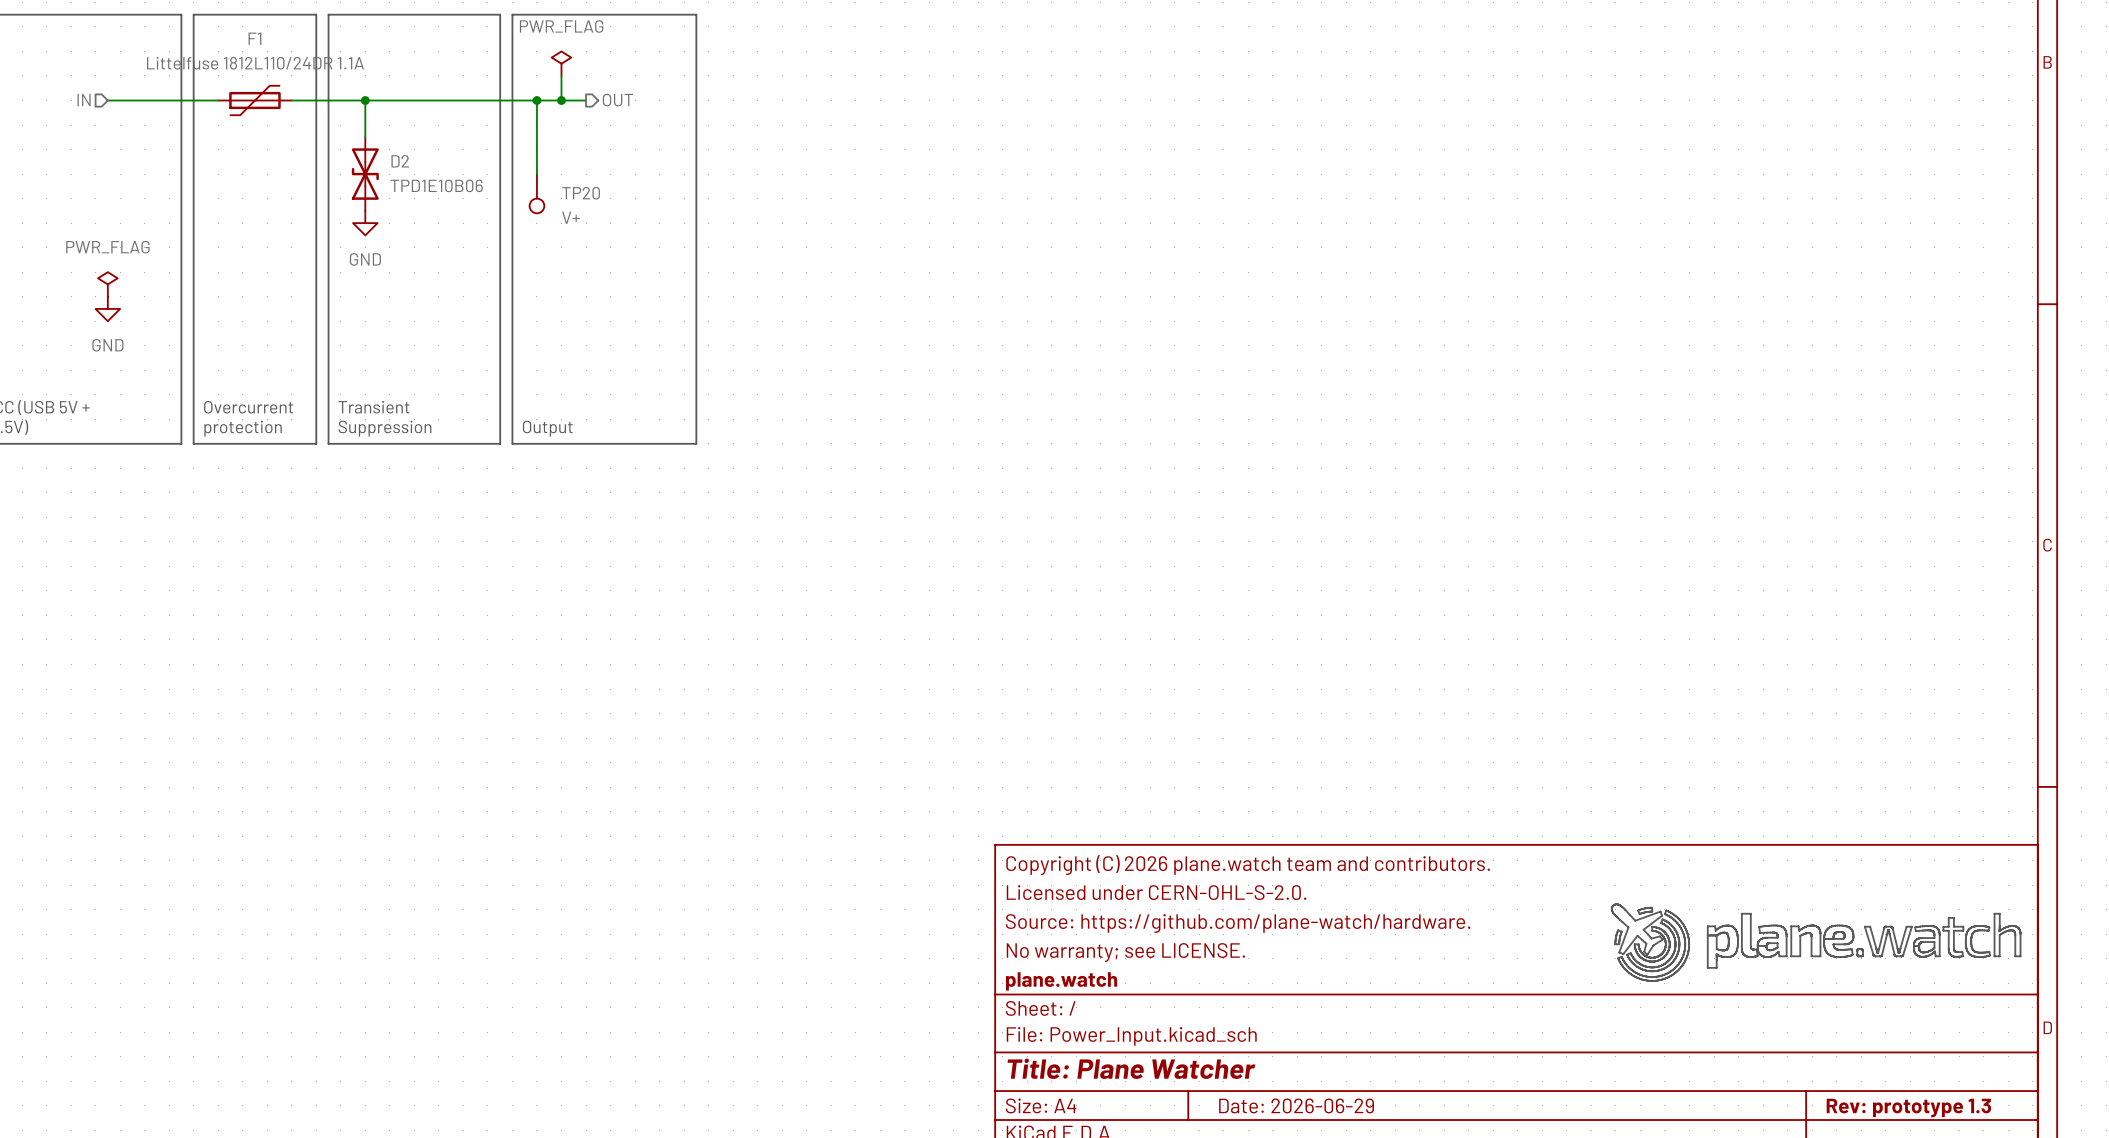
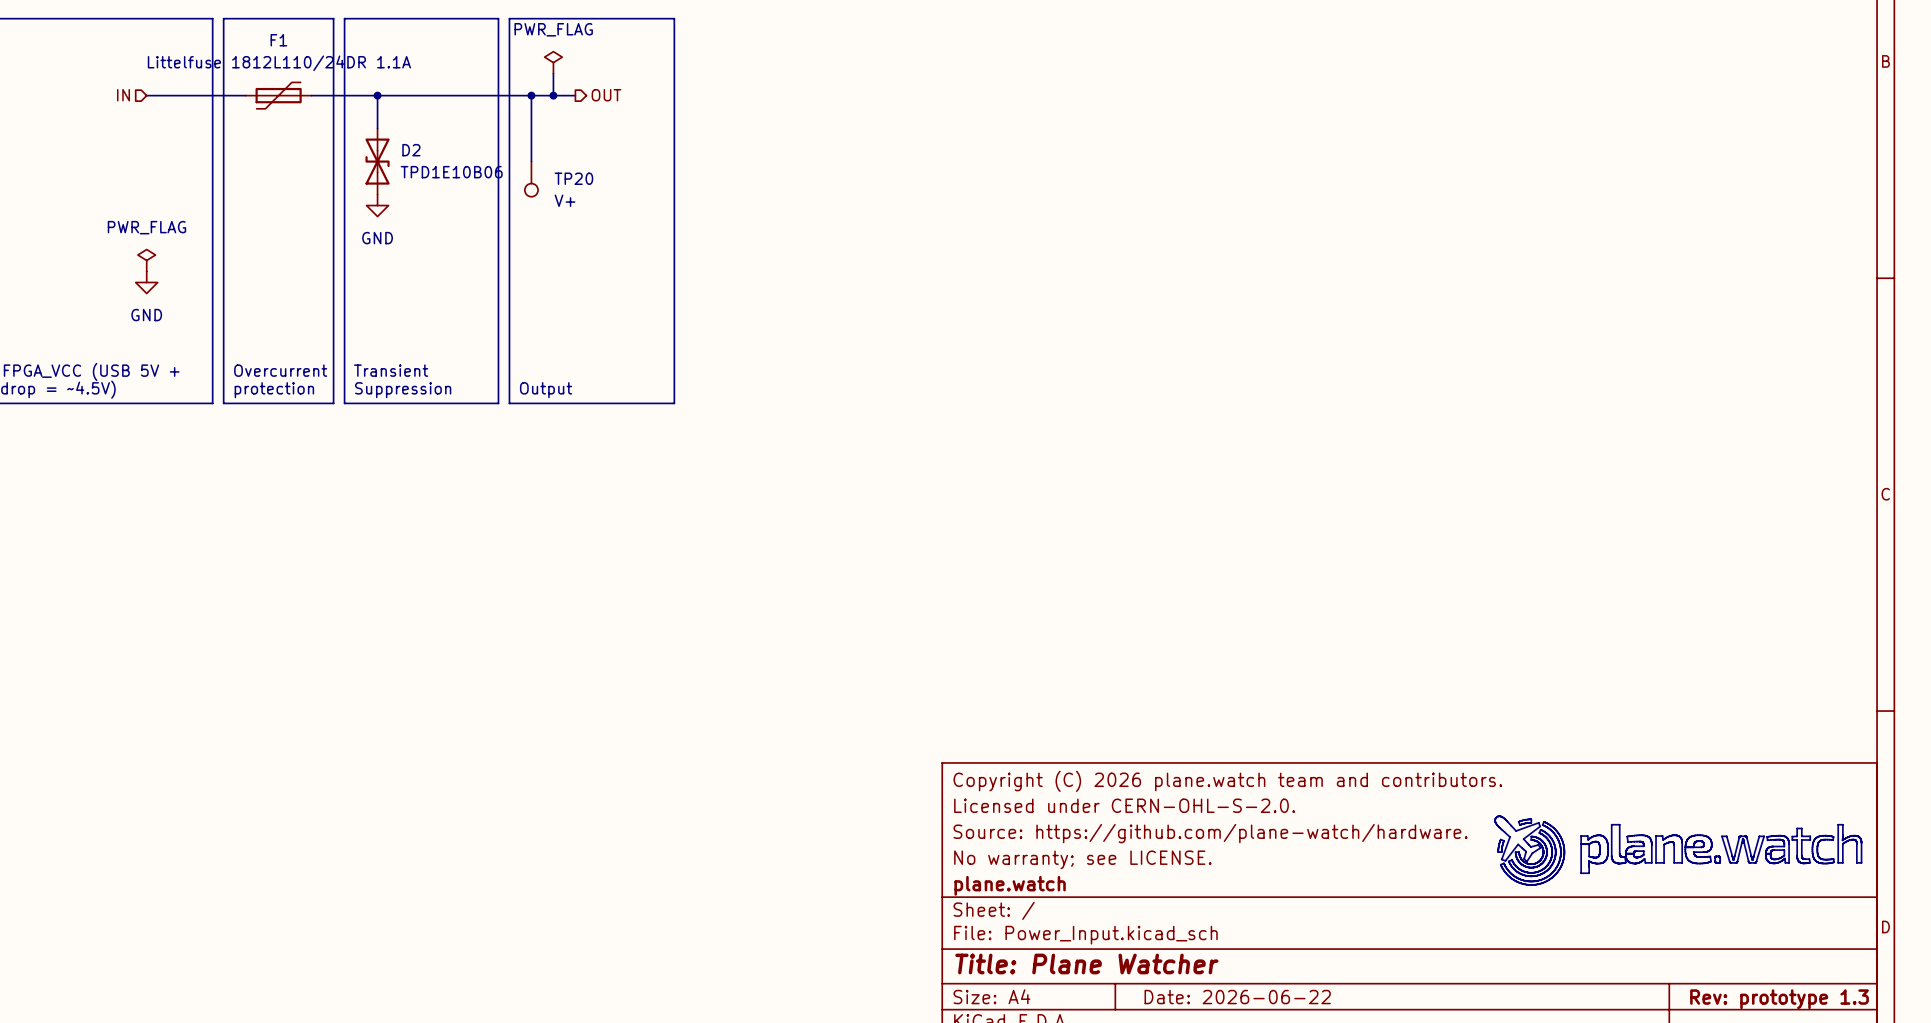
title block: Date: 2026-06-29 (1296, 1105) -> Date: 2026-06-22 (1237, 997)

